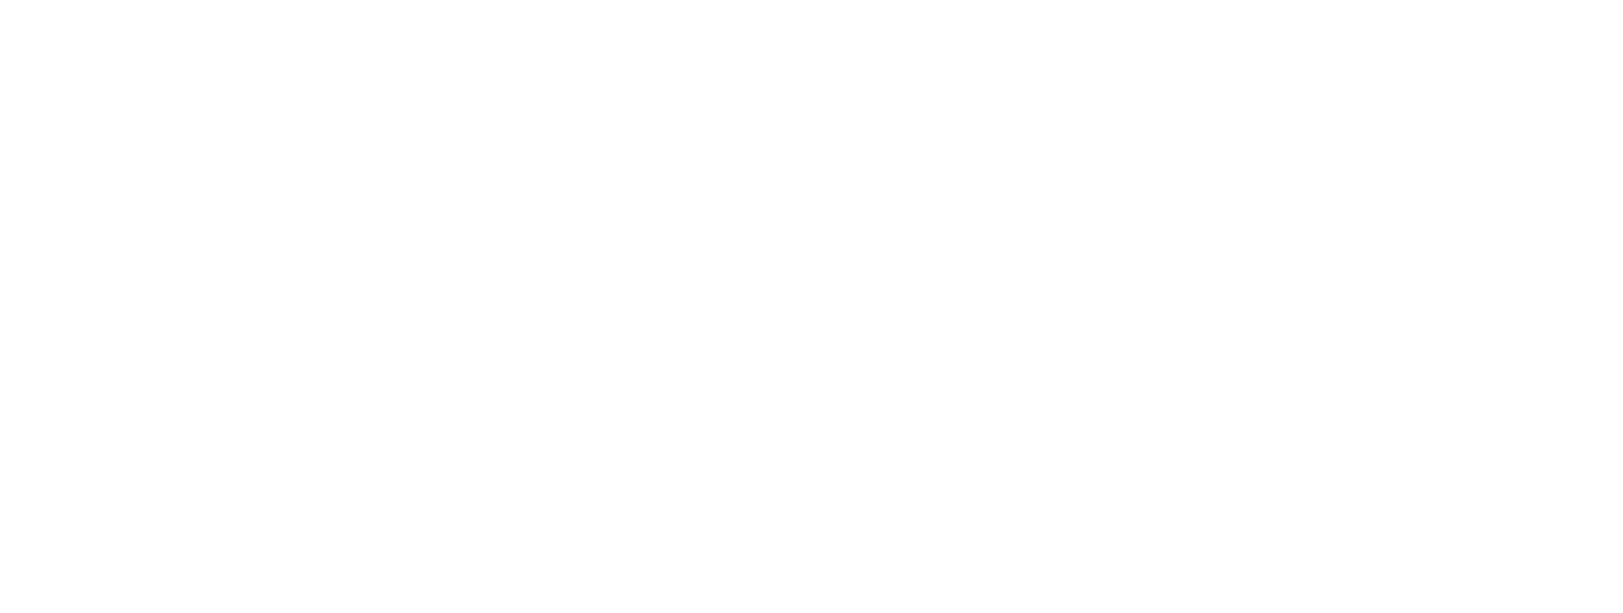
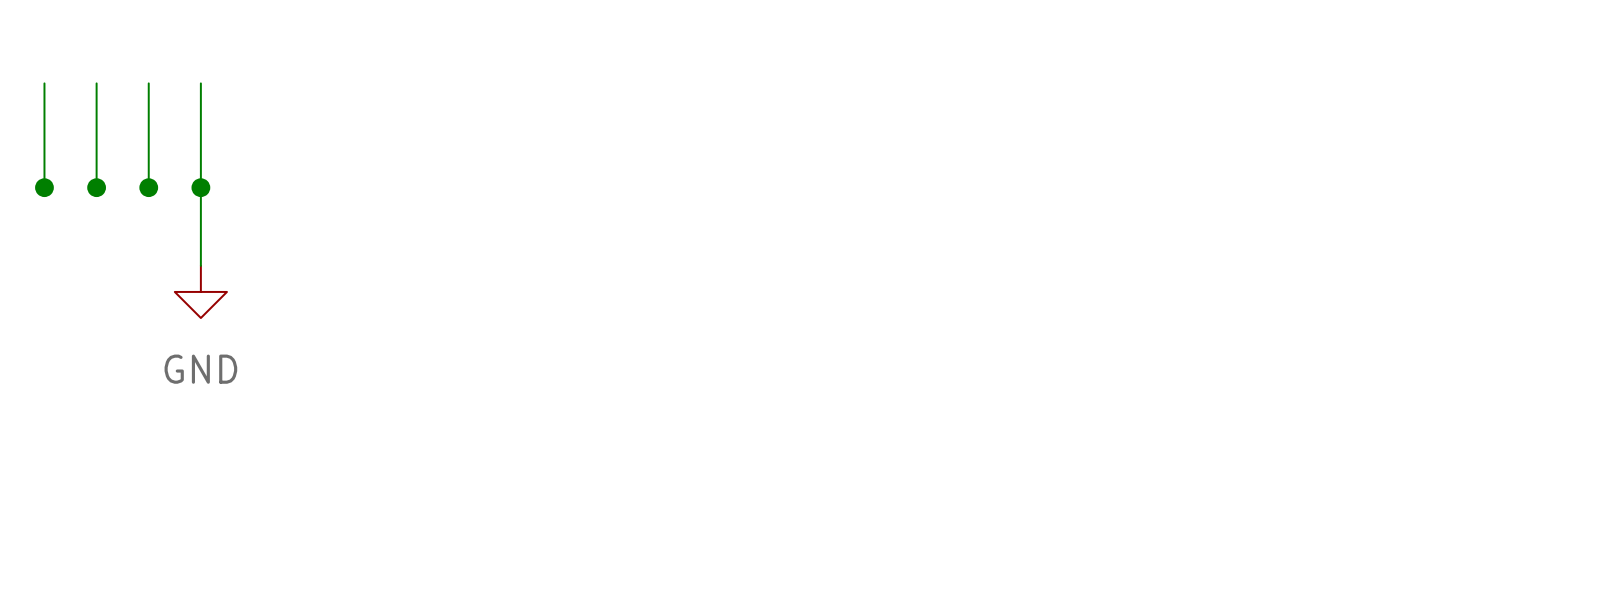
wire: none -> (44, 83) (44, 187)
wire: none -> (96, 83) (96, 187)
wire: none -> (148, 83) (148, 187)
wire: none -> (200, 83) (200, 265)
junction: none -> (44, 187)
junction: none -> (96, 187)
junction: none -> (148, 187)
junction: none -> (200, 187)
power symbol: none -> GND (200, 291)

